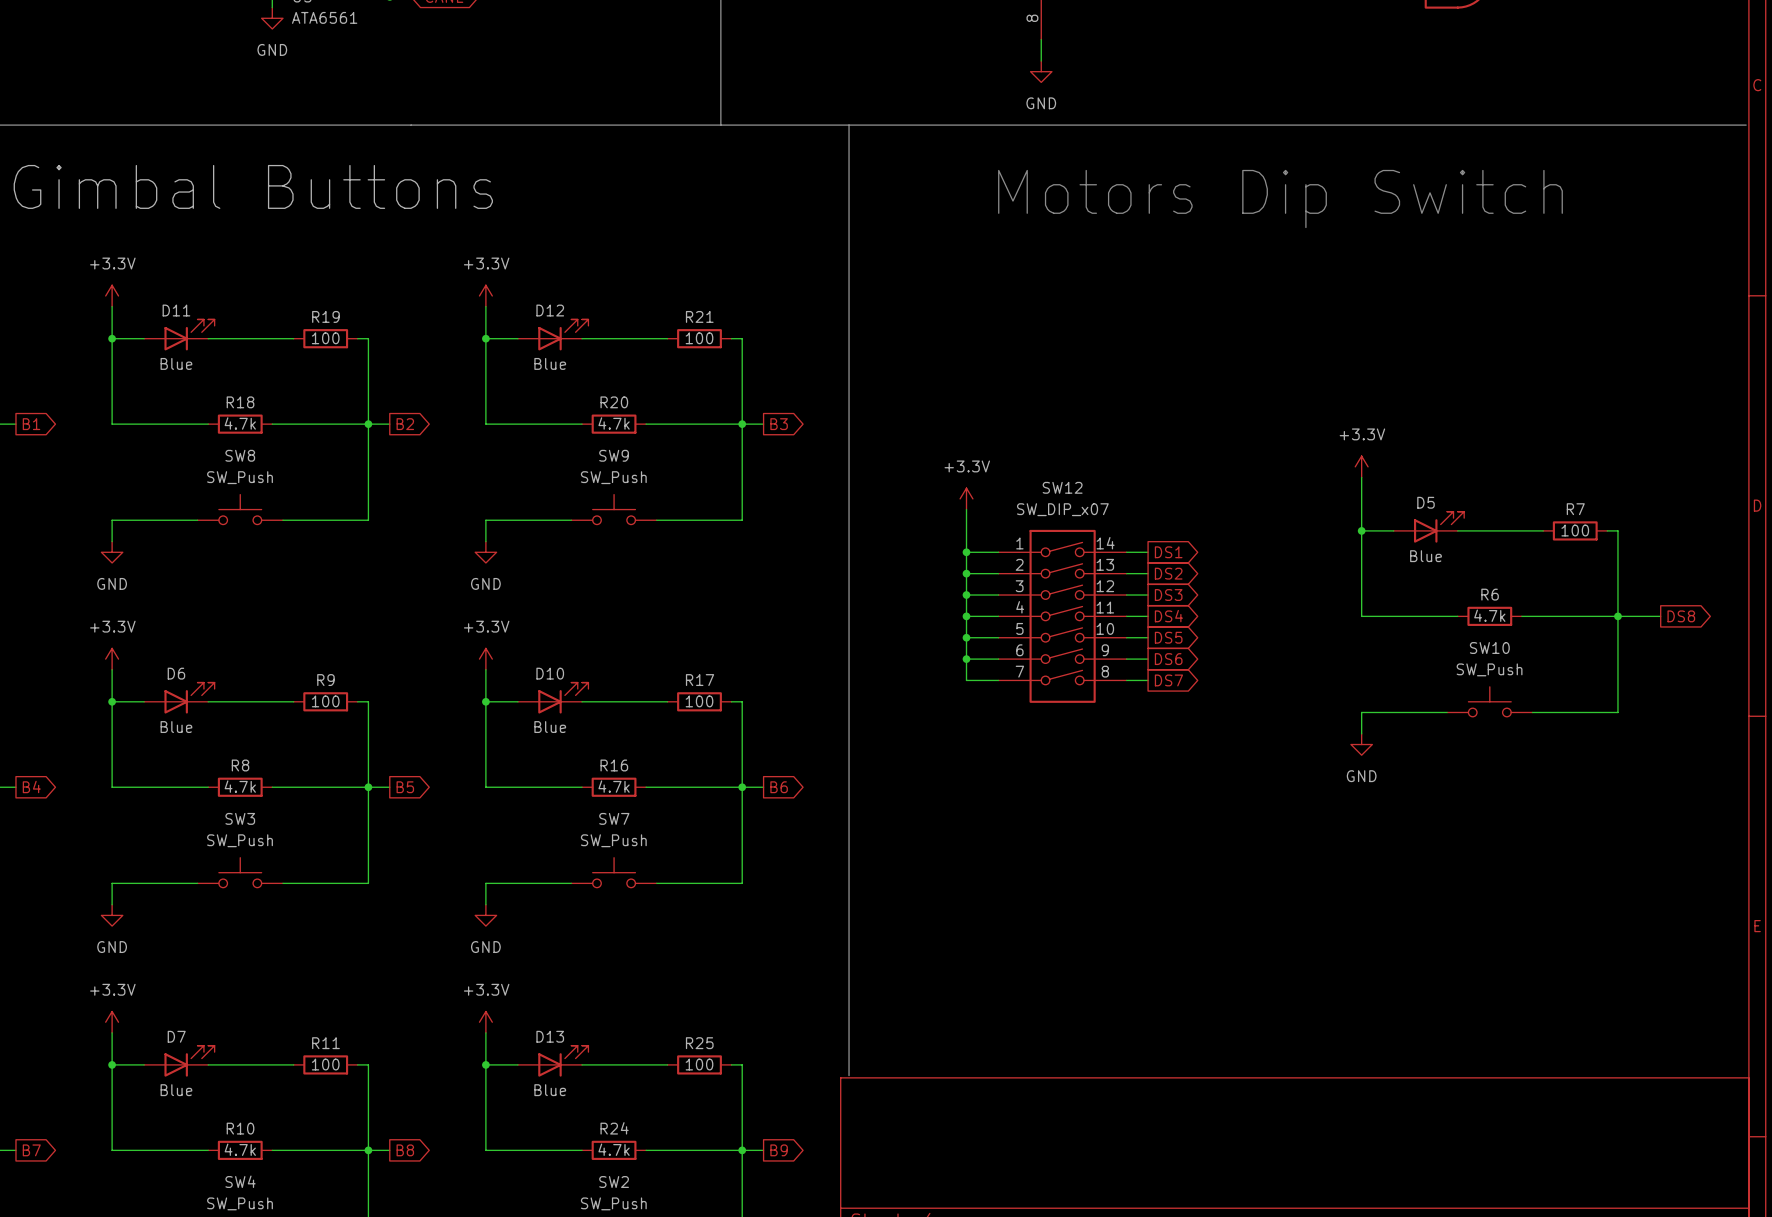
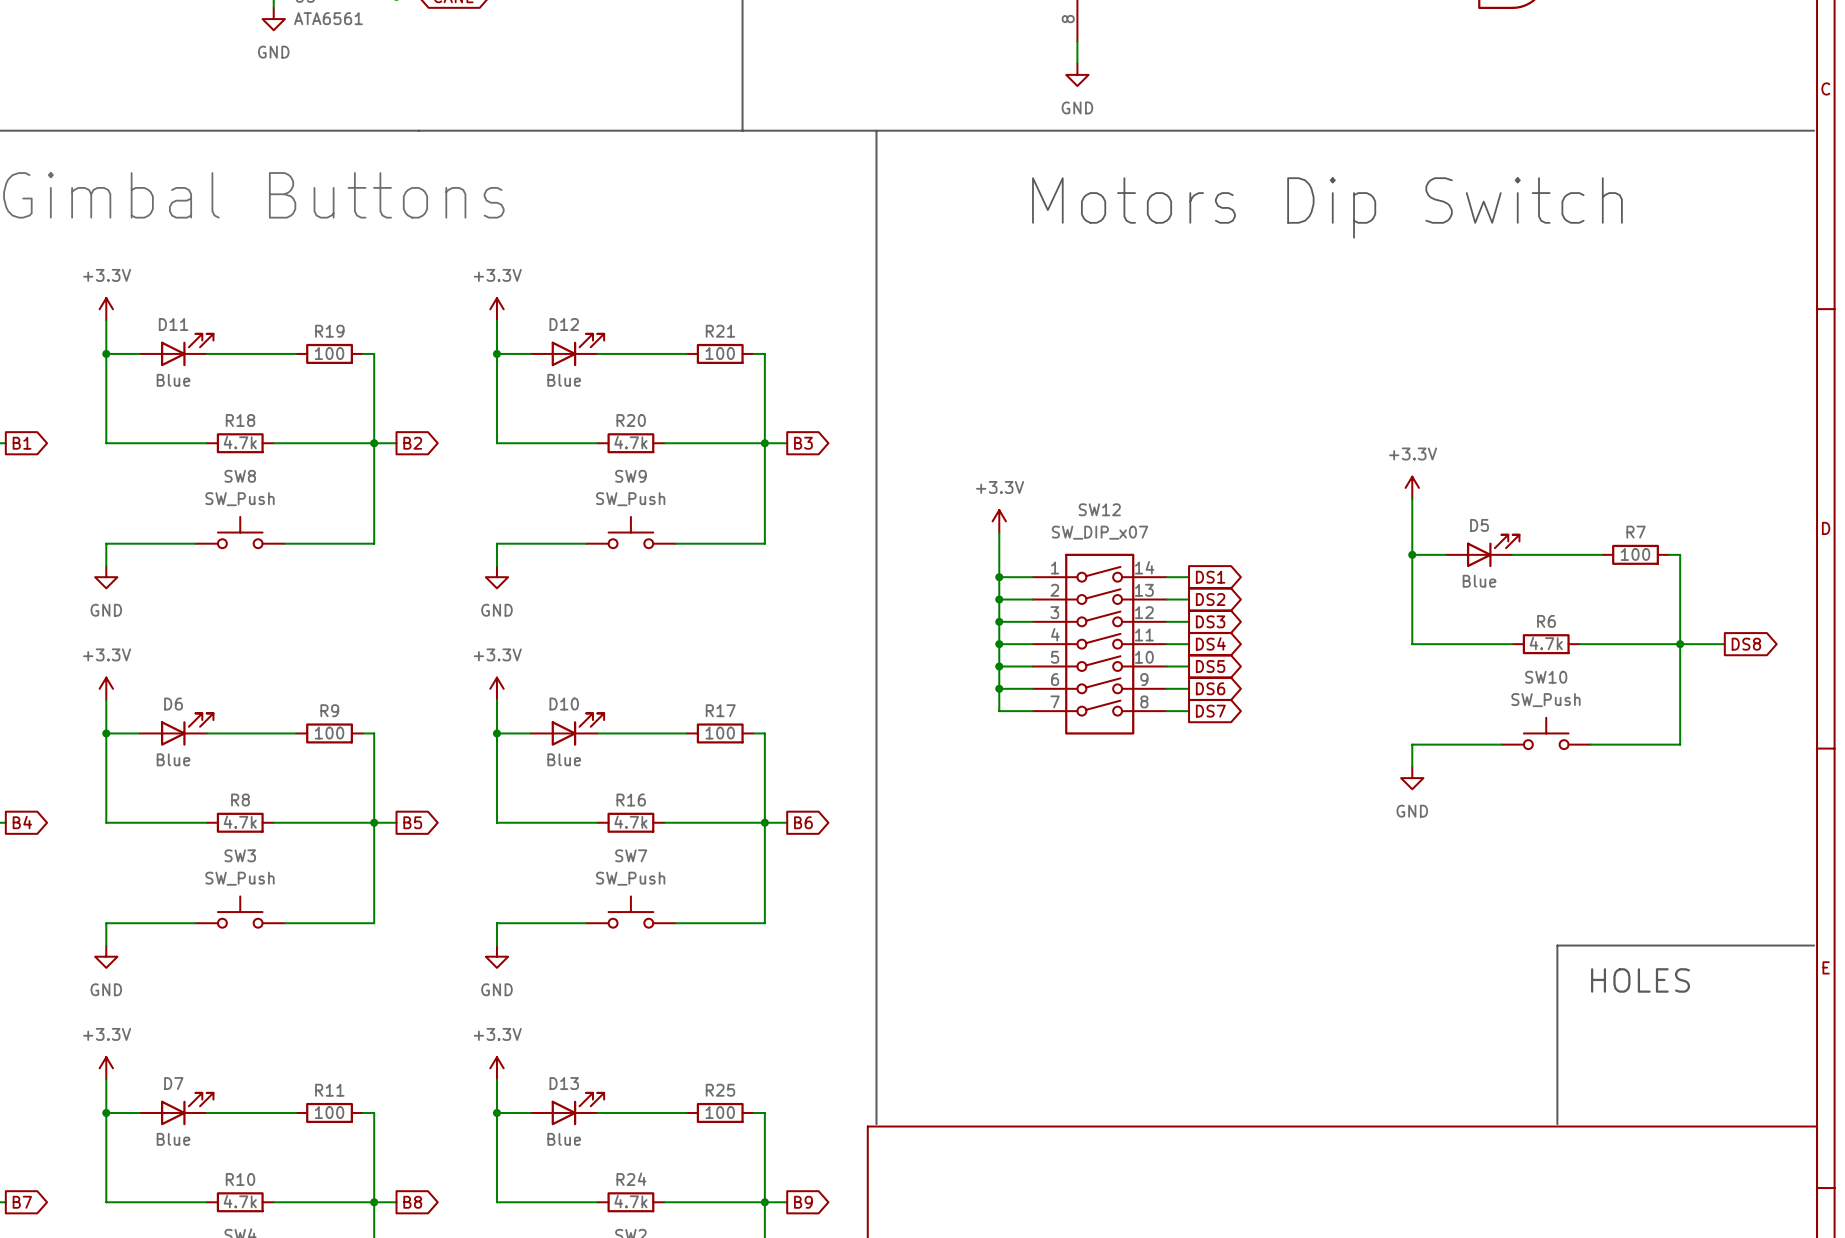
line: none -> (1814, 945) (1557, 945) (1557, 1124)
text: none -> HOLES (1640, 980)

